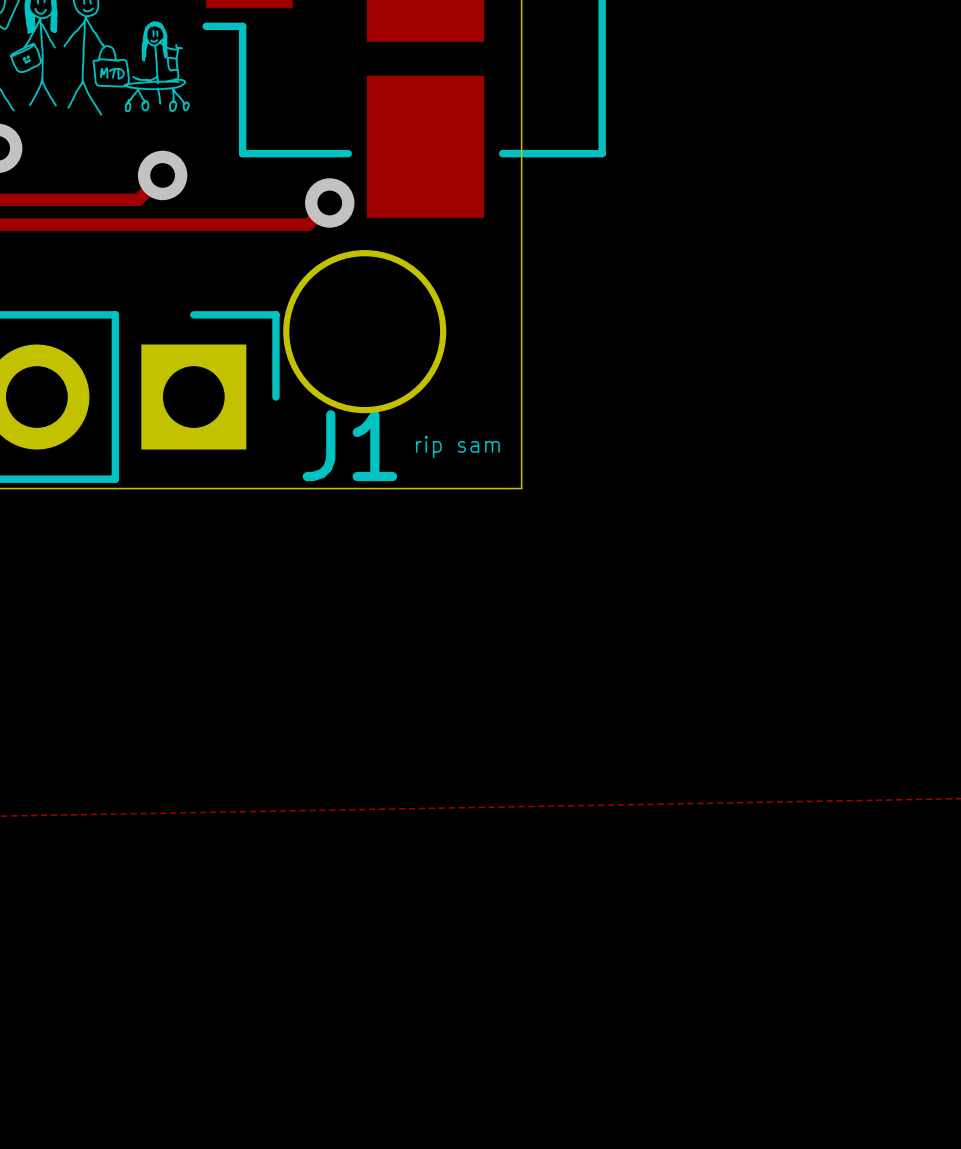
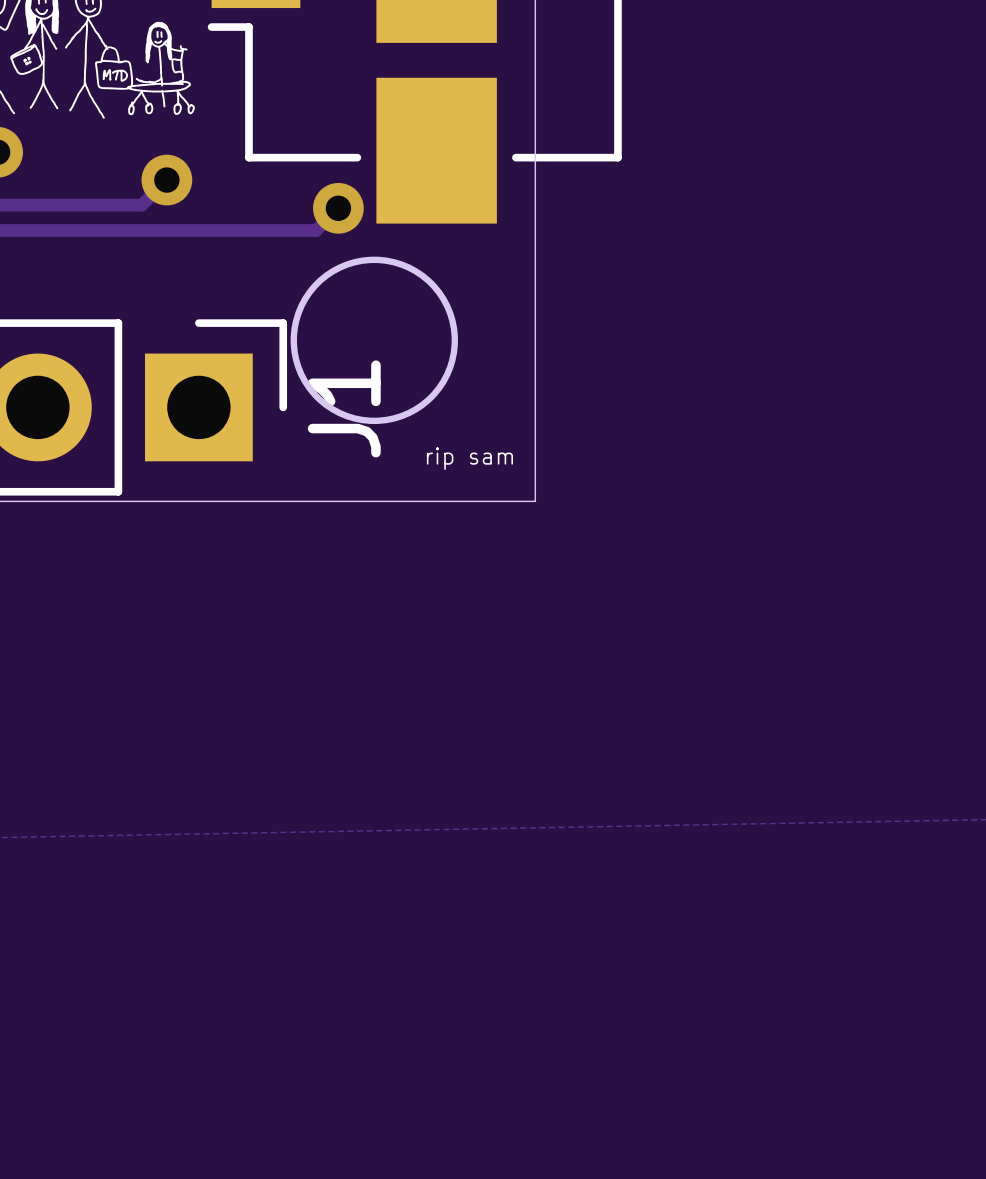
J1 name rotation: 0° (349, 445) -> 90° counterclockwise (344, 408)

